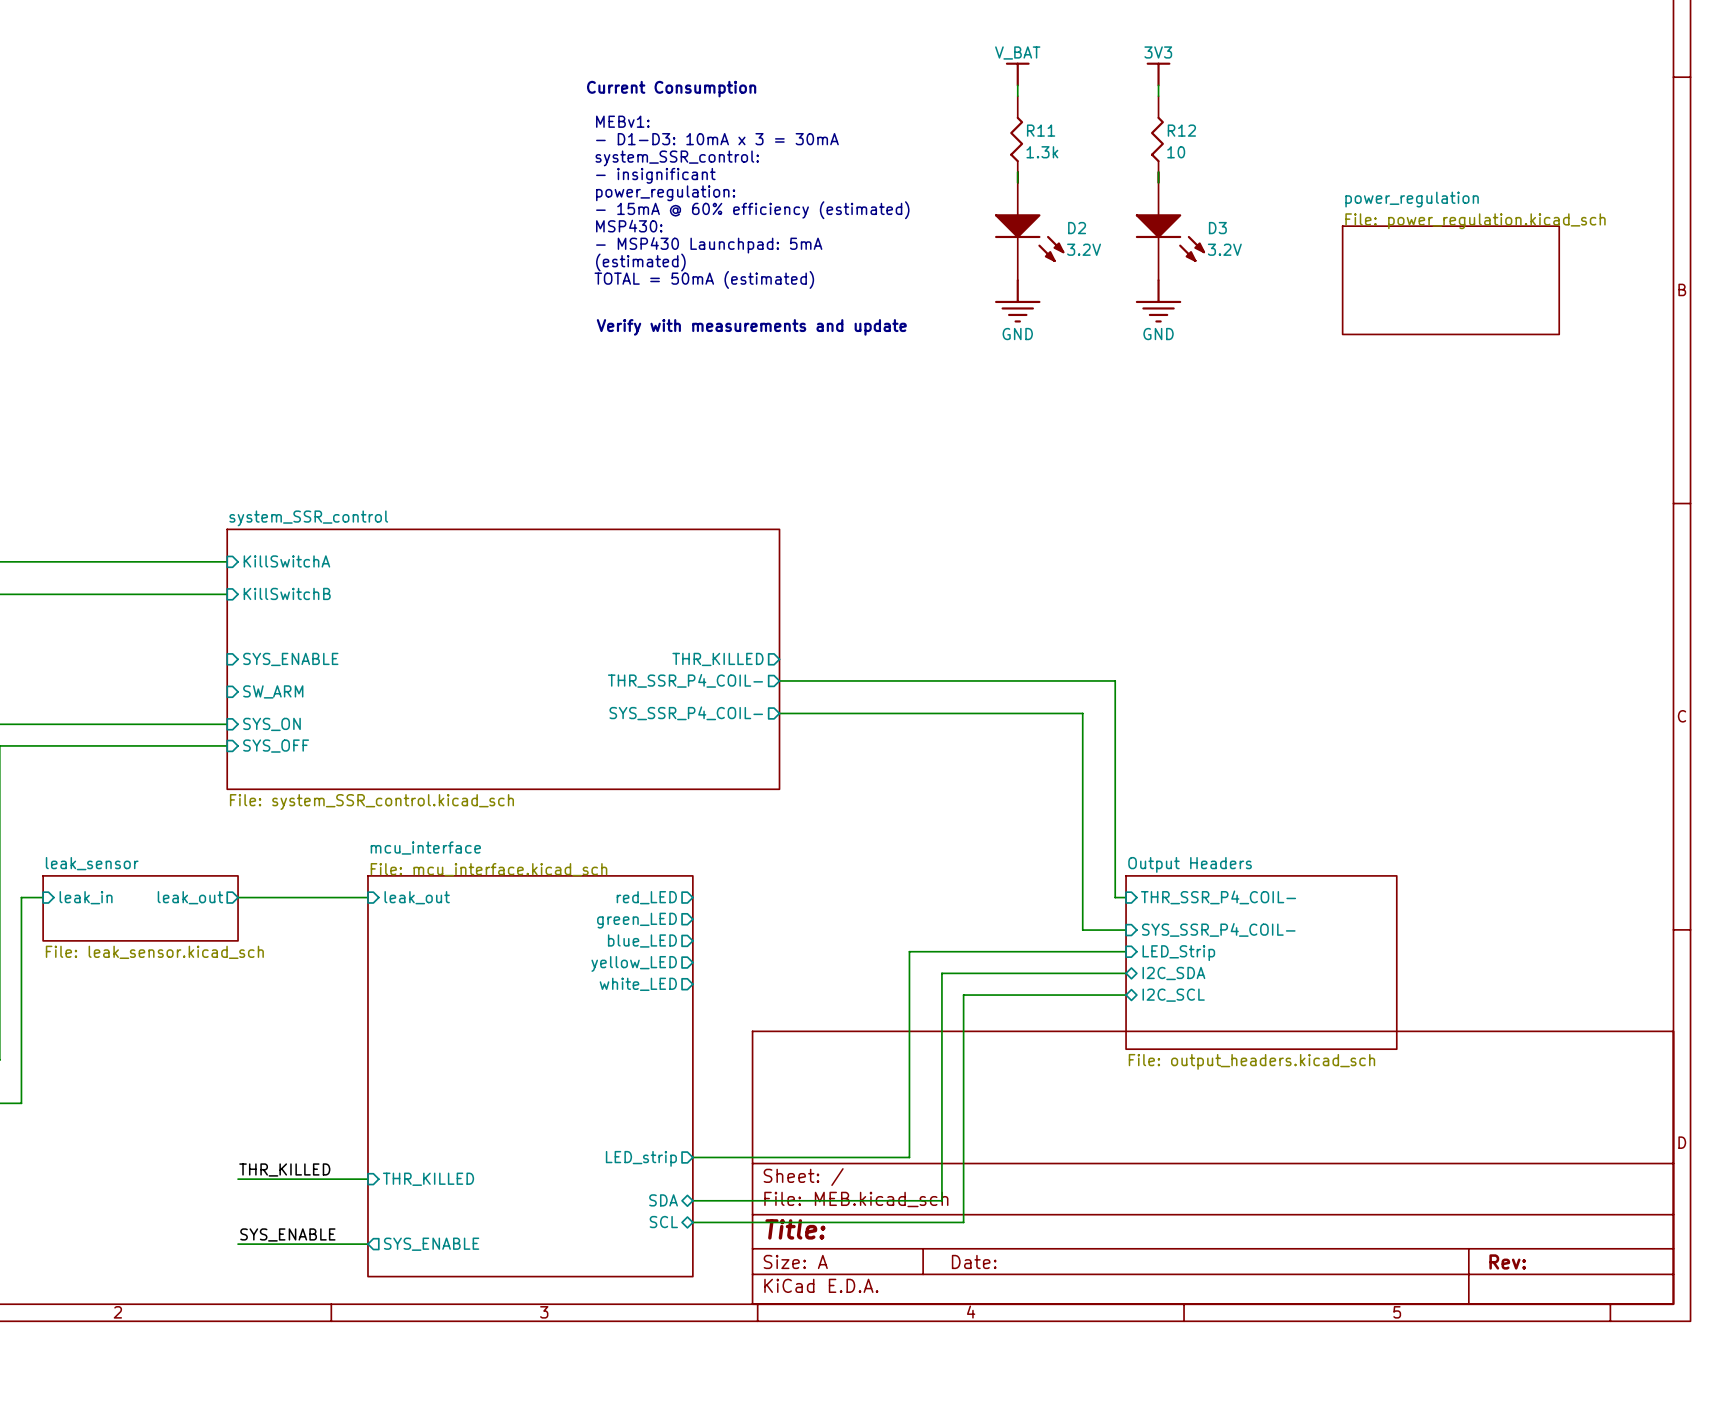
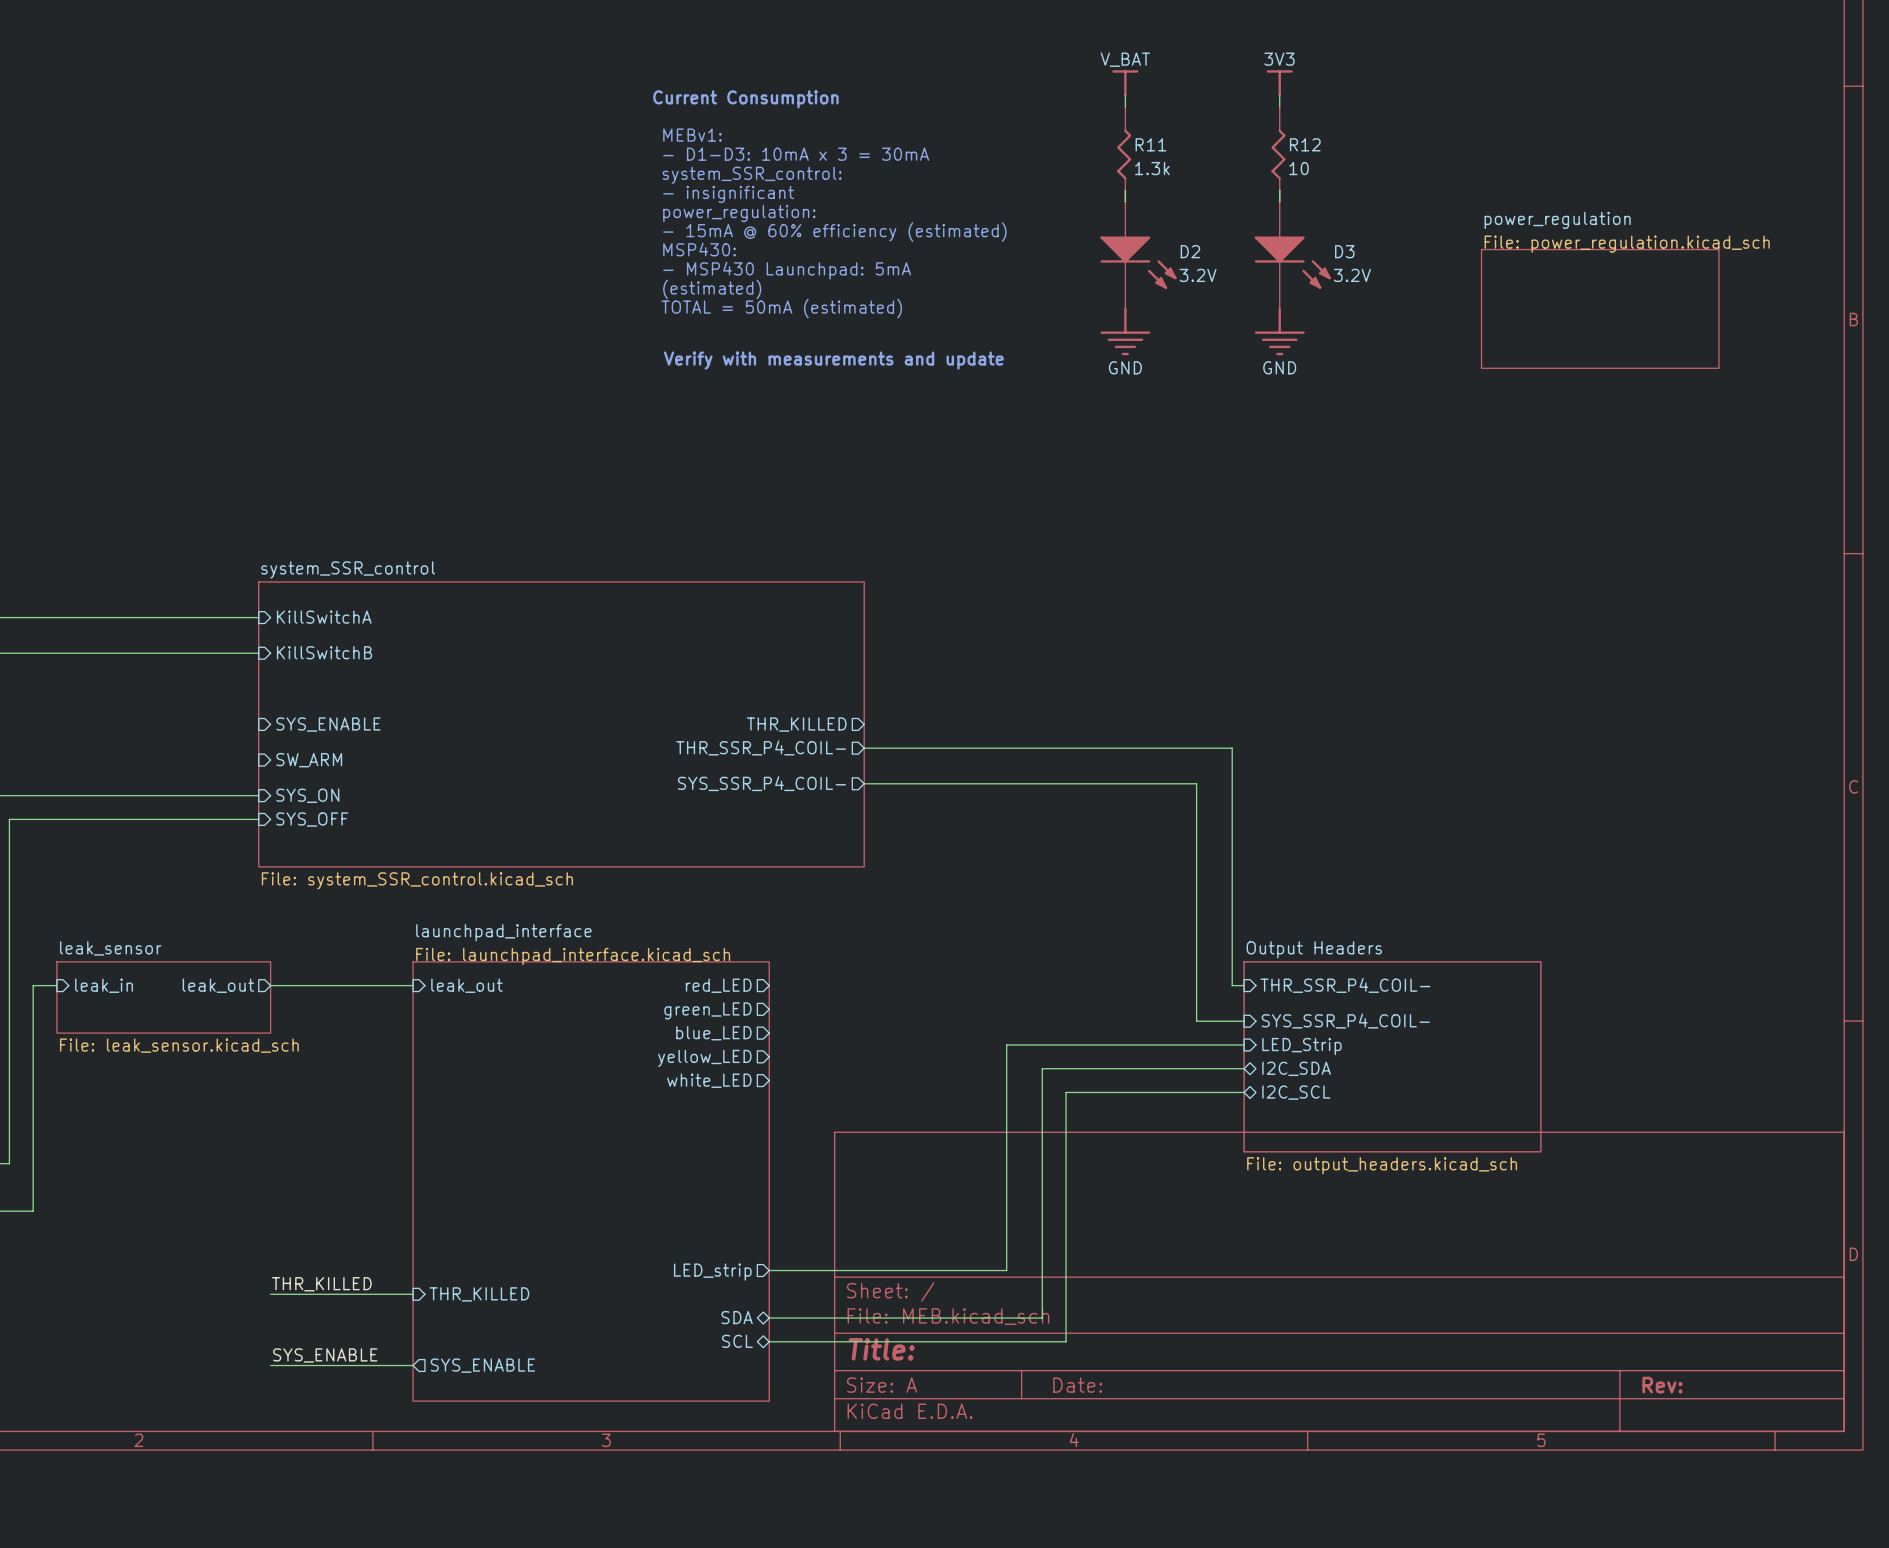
sheet mcu_interface name: mcu_interface (425, 848) -> launchpad_interface (503, 932)
sheet mcu_interface value: File: mcu_interface.kicad_sch (489, 869) -> File: launchpad_interface.kicad_sch (573, 956)

